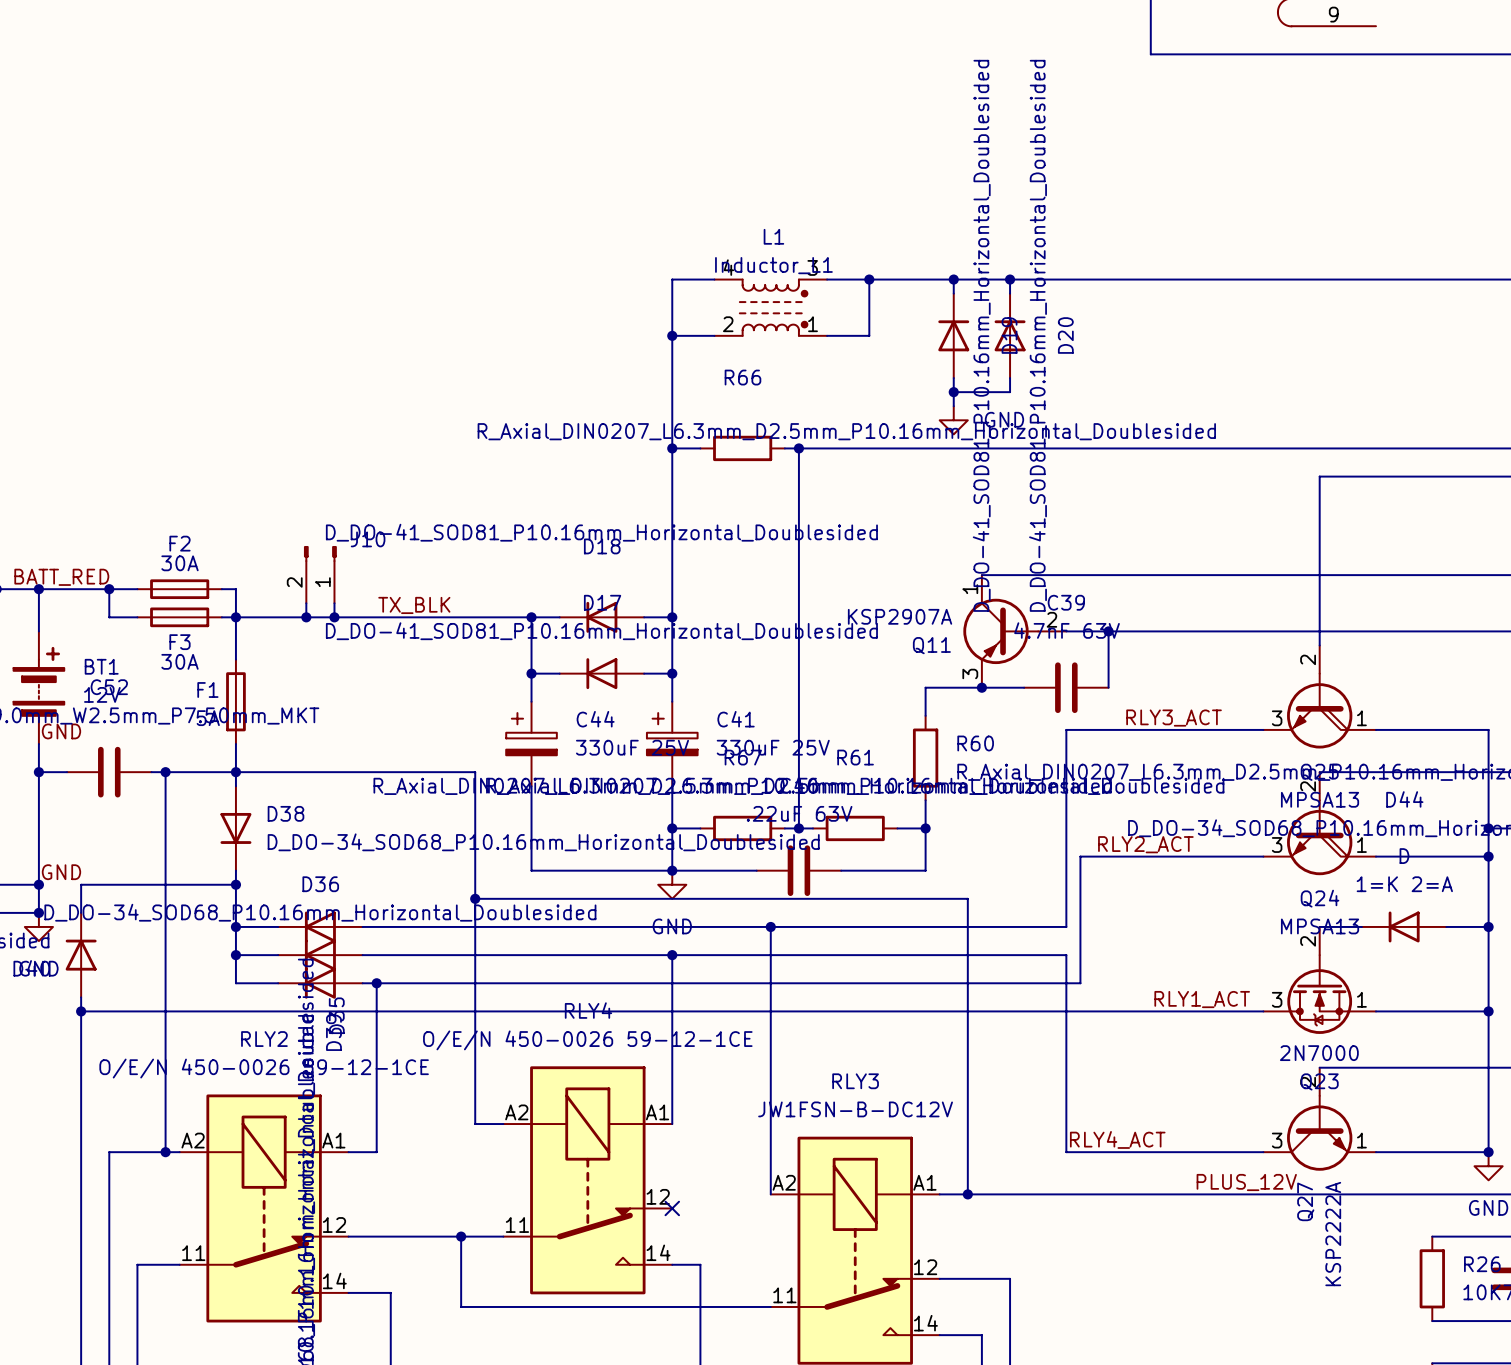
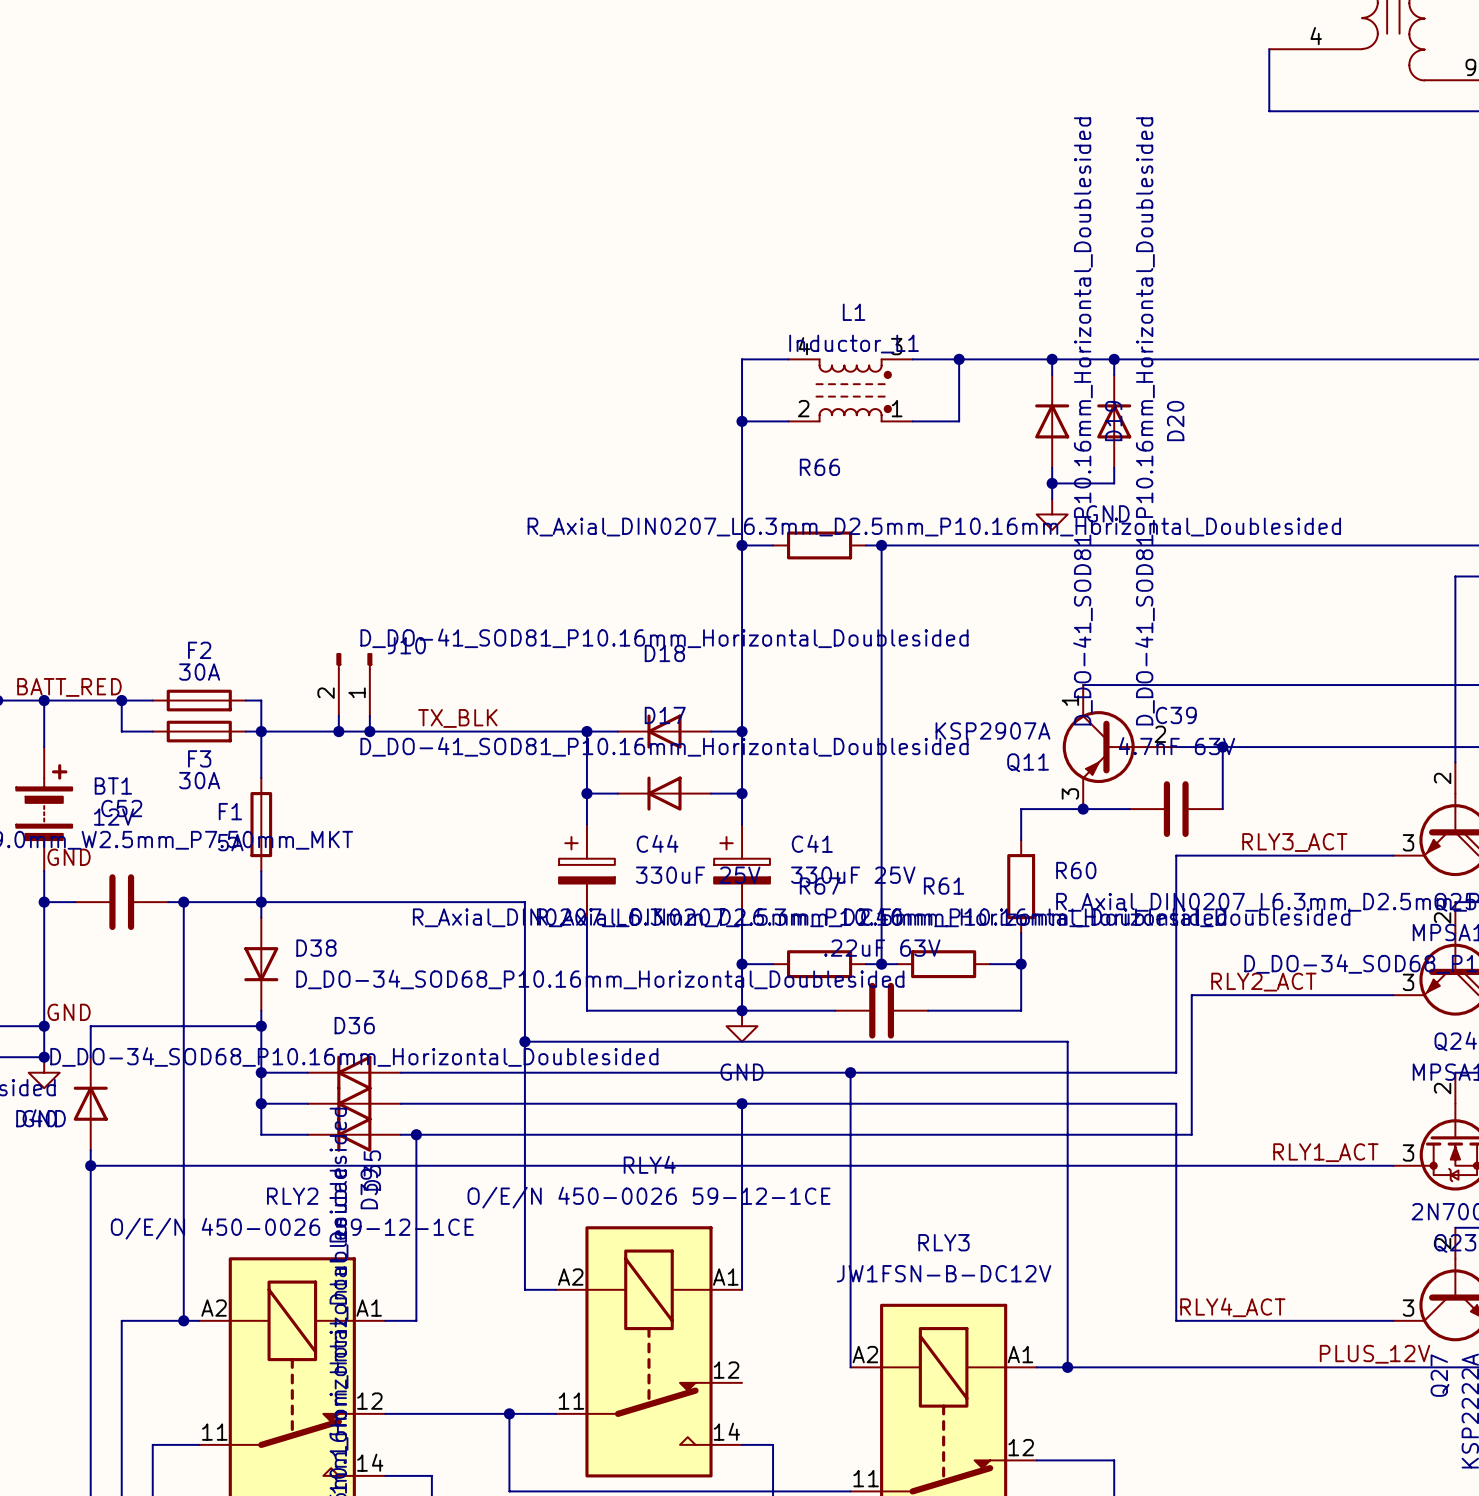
no-connect mark: (672, 1208) -> none

